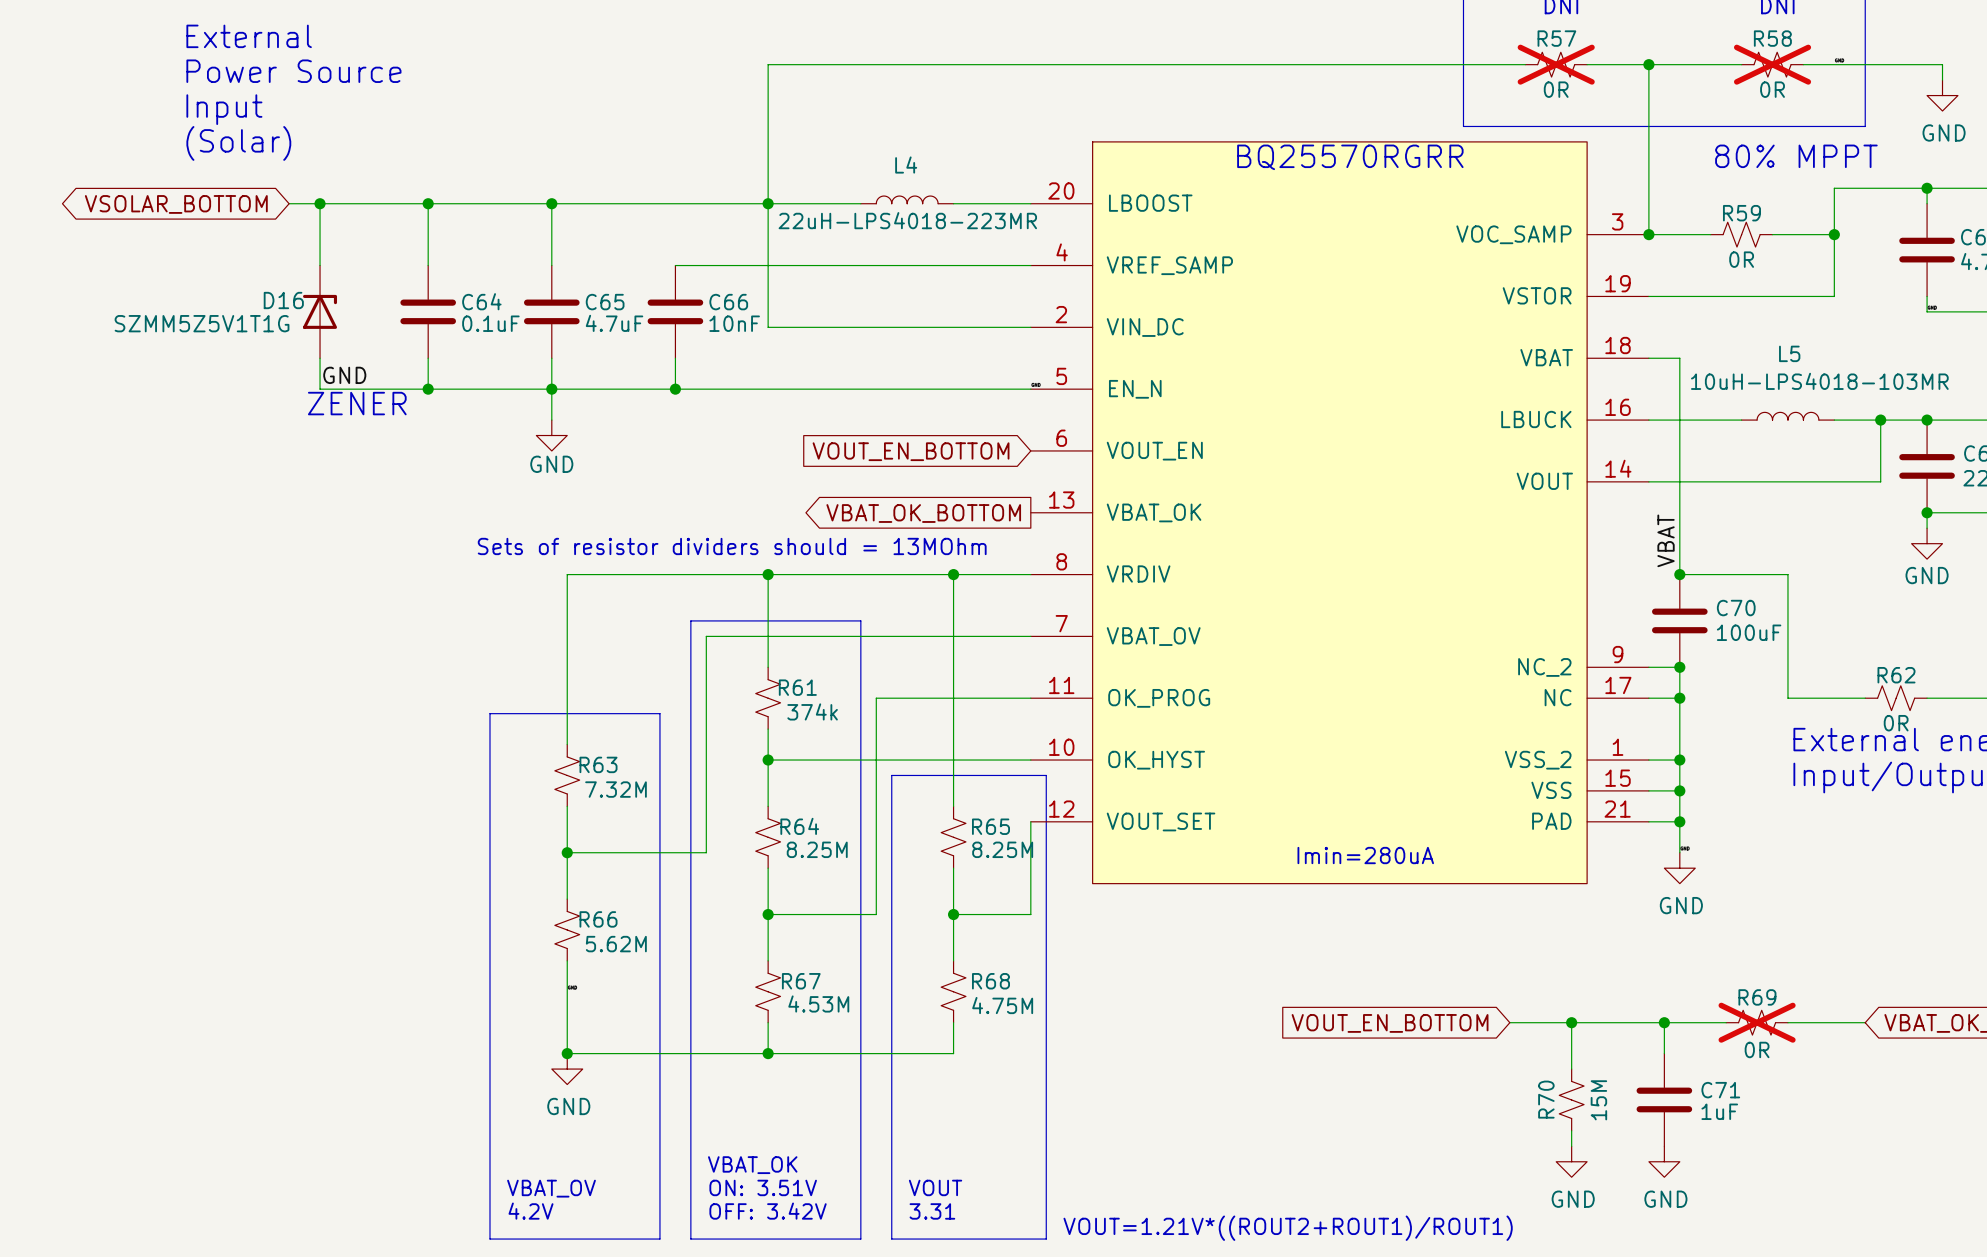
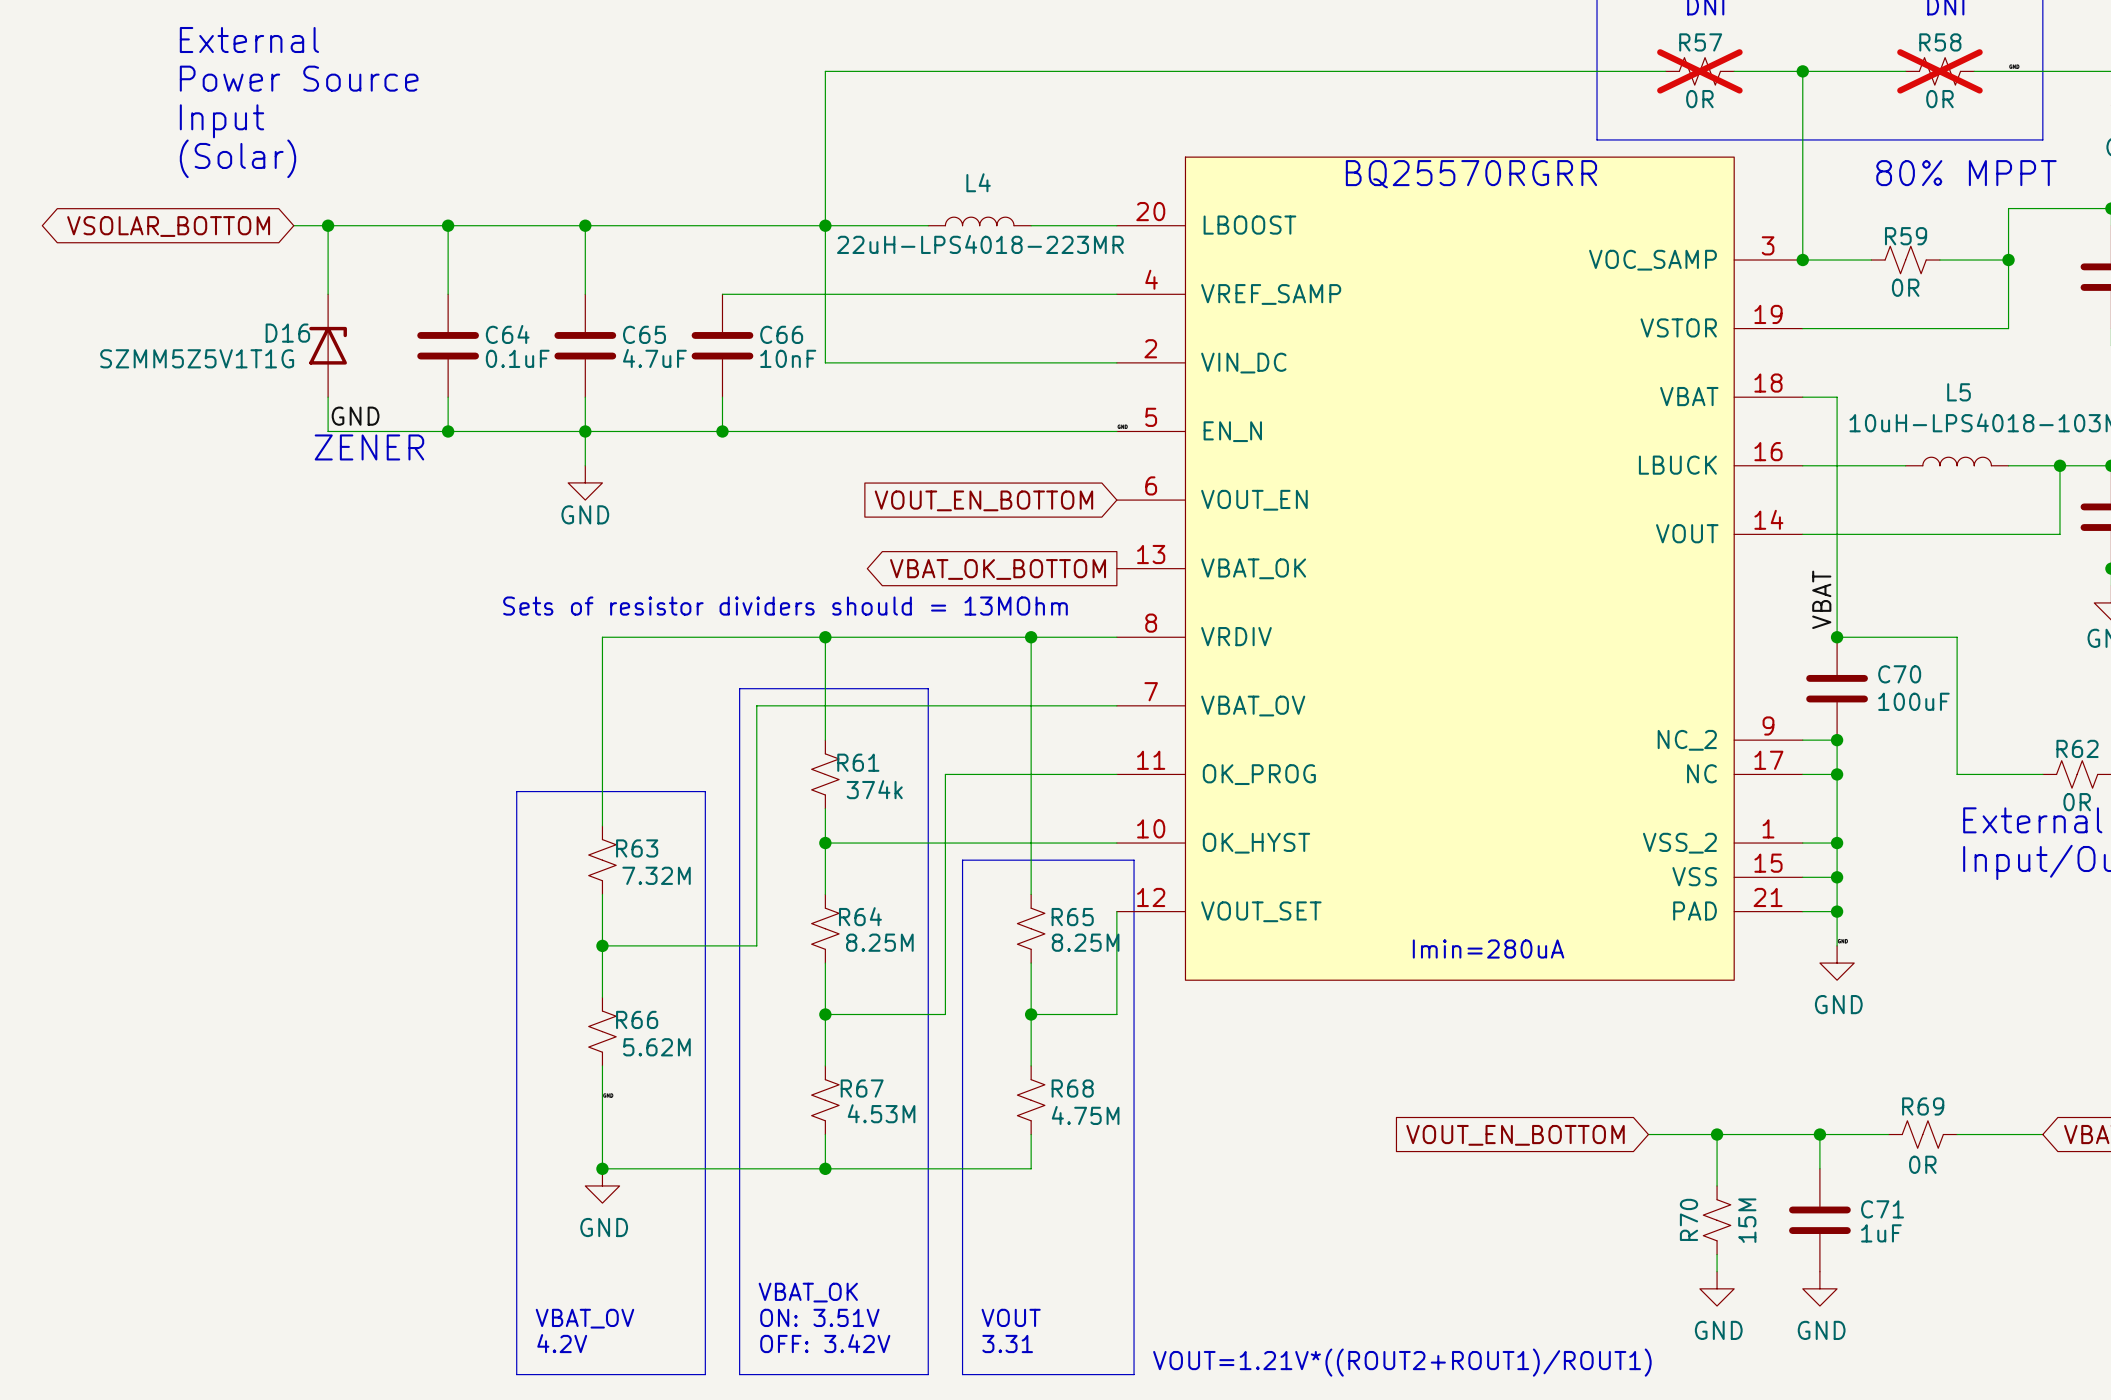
R69 do-not-place cross: (1757, 1022) -> none

